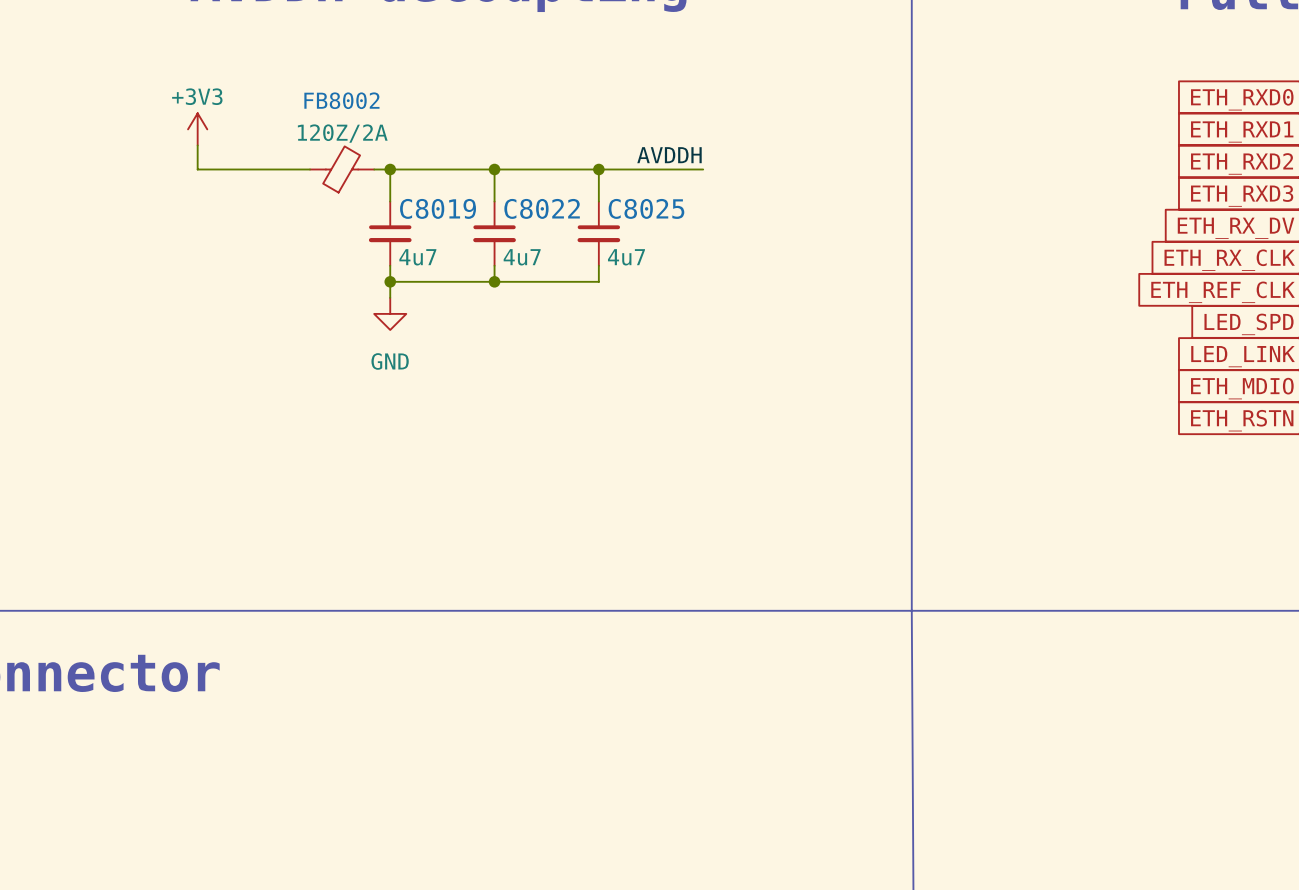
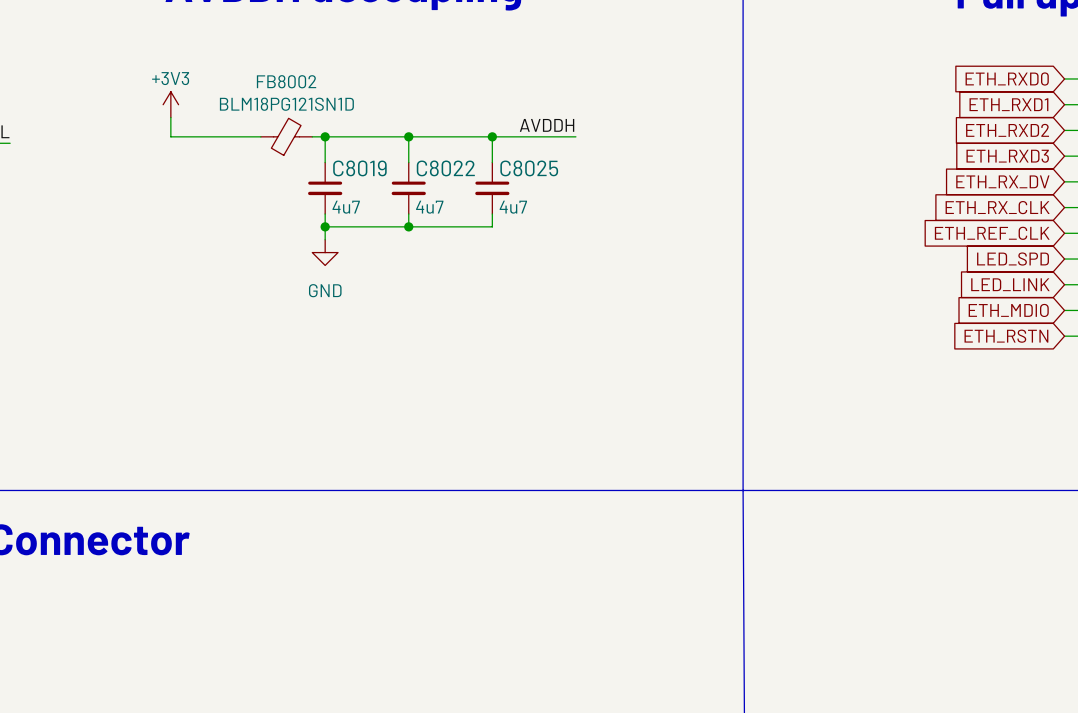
FB8002 text: none -> BLM18PG121SN1D (286, 104)
FB8002 text: 120Z/2A (342, 133) -> none

